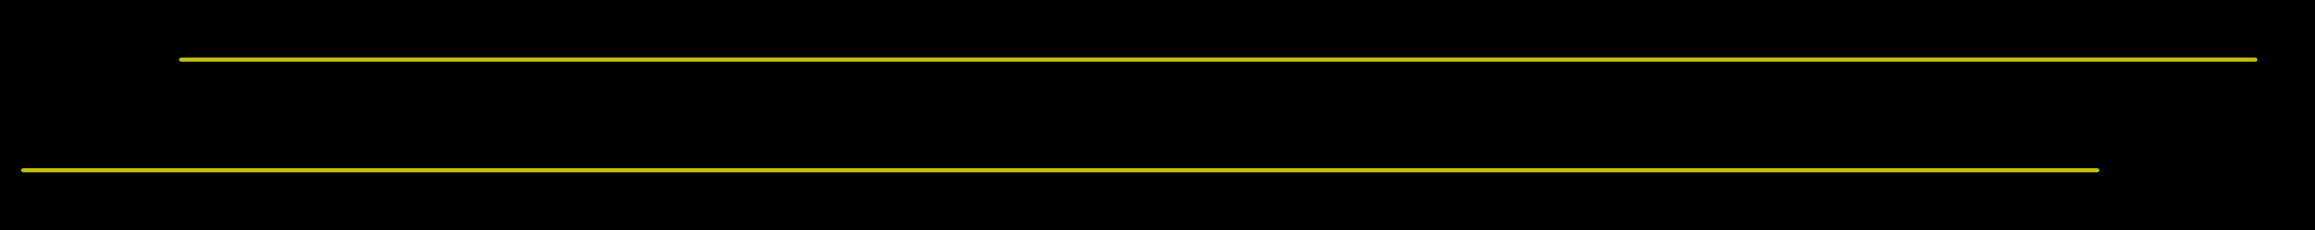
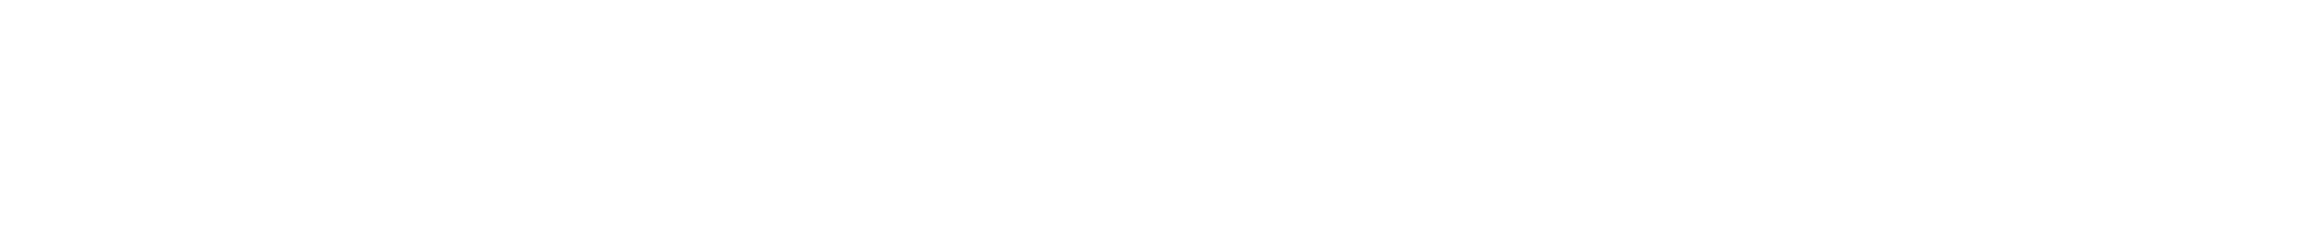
board edge: (181, 59) (2255, 59) -> none
board edge: (23, 170) (2097, 170) -> none

